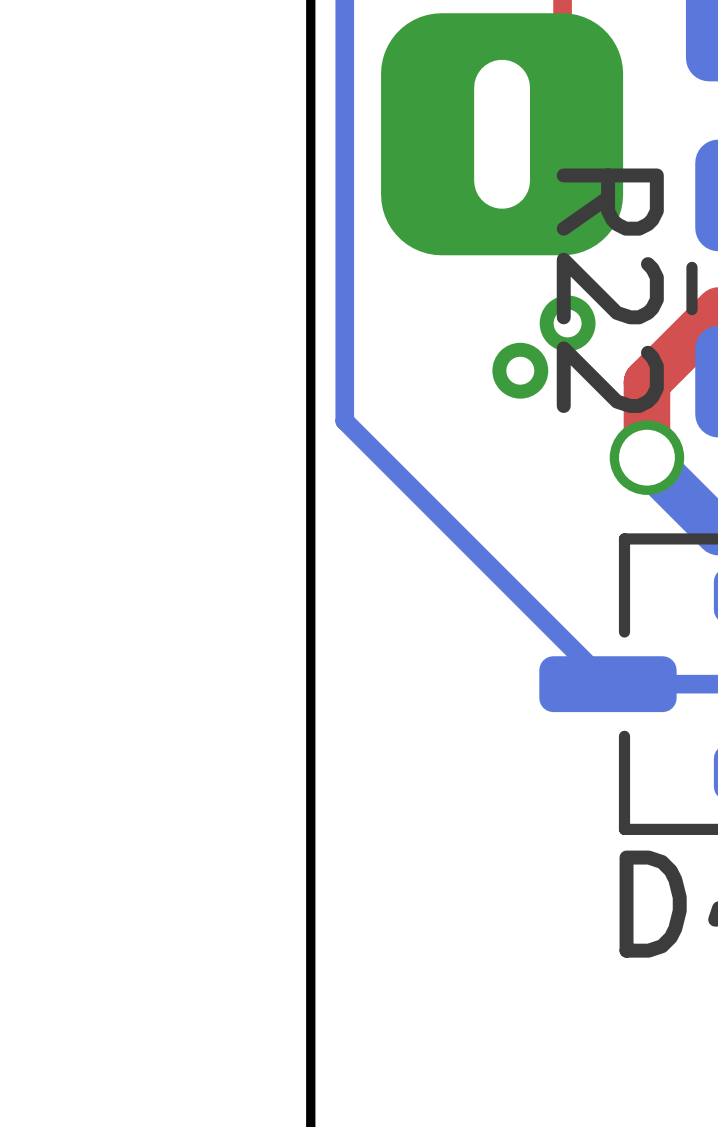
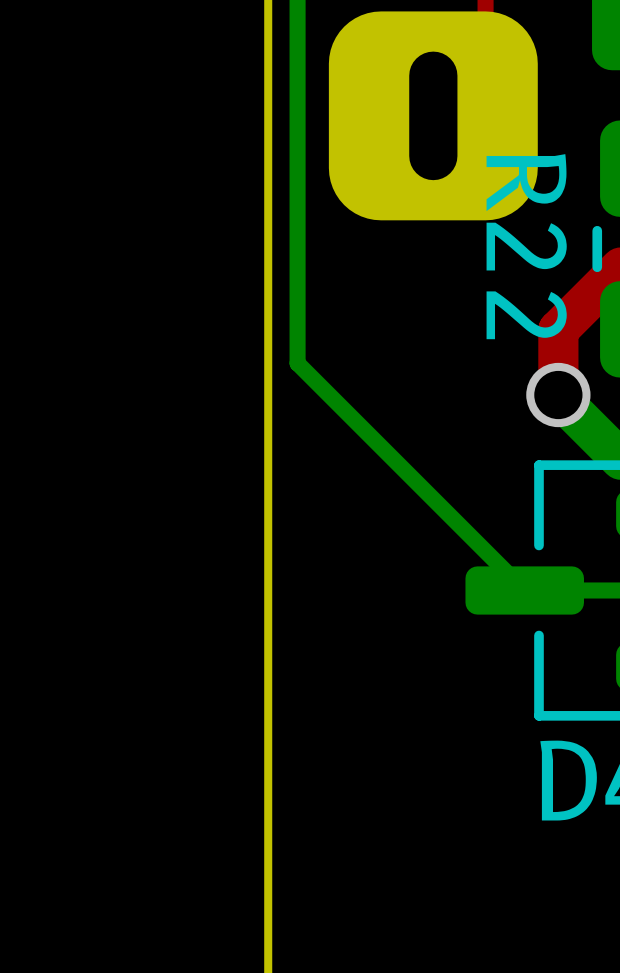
via: (567, 323) -> none
via: (520, 370) -> none

